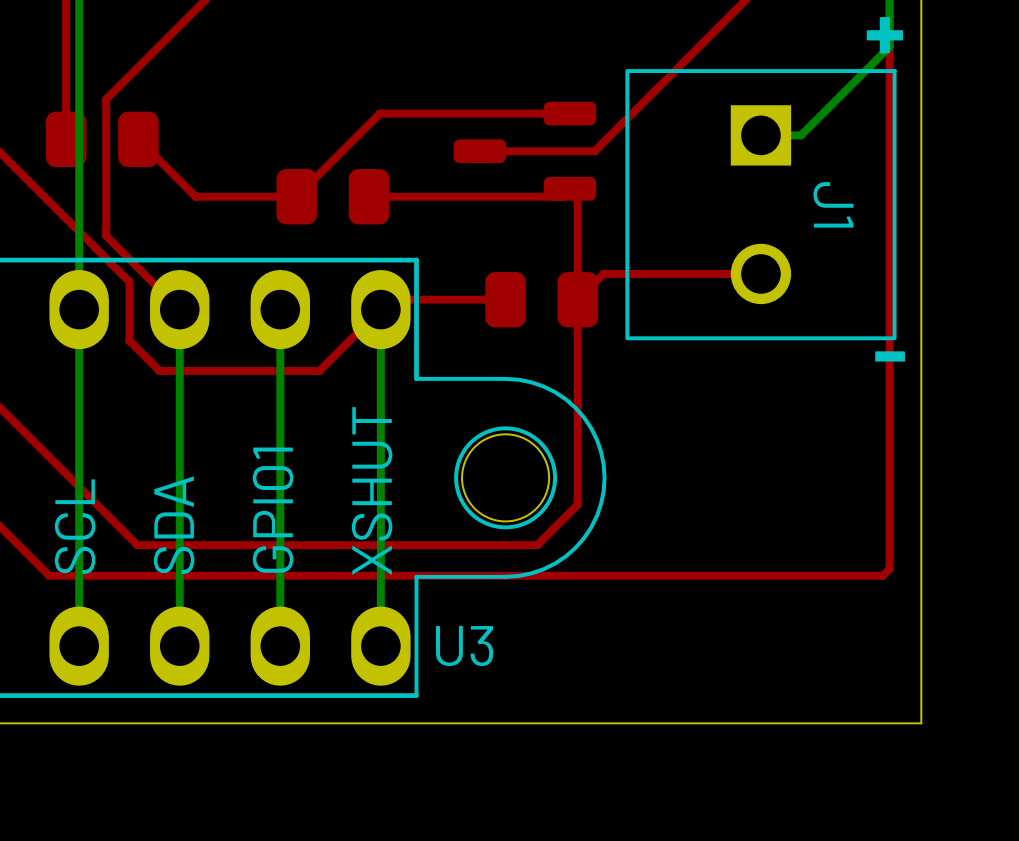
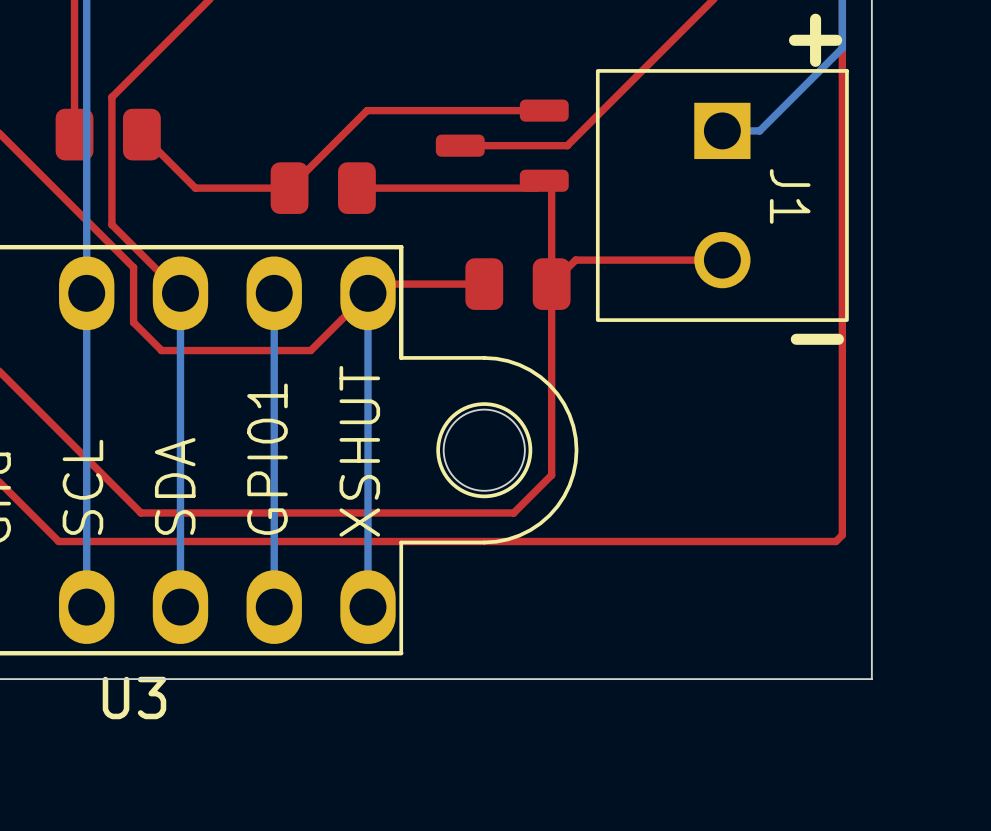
U3 name position: U3 (464, 646) -> U3 (134, 698)

